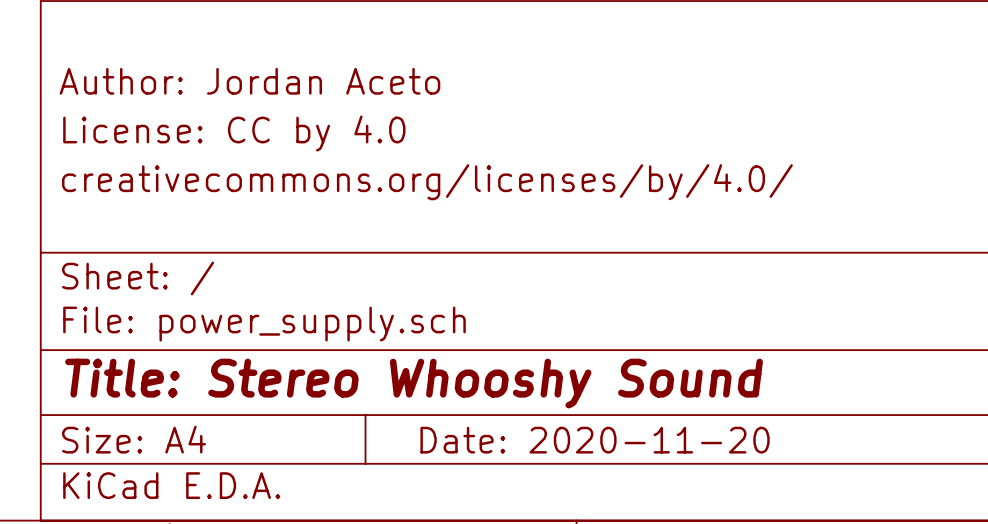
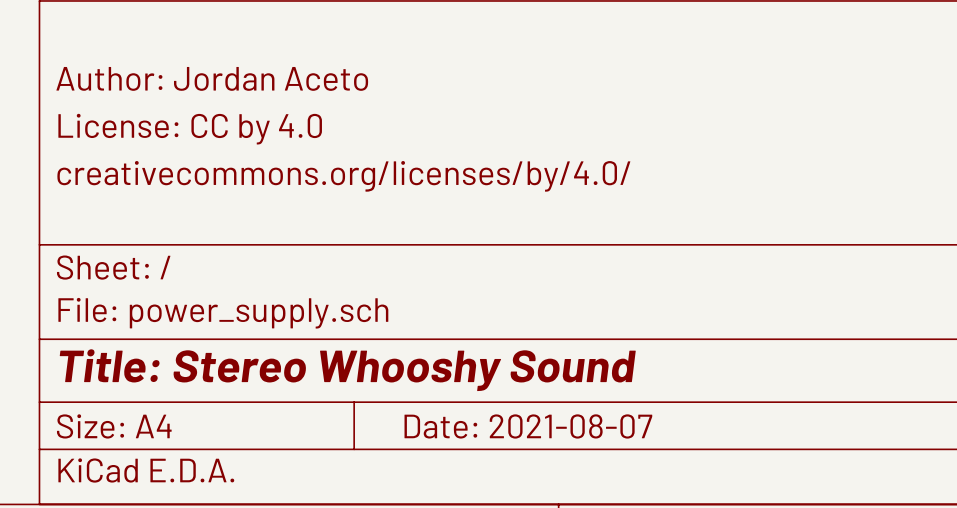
title block: Date: 2020-11-20 (595, 440) -> Date: 2021-08-07 (528, 426)

